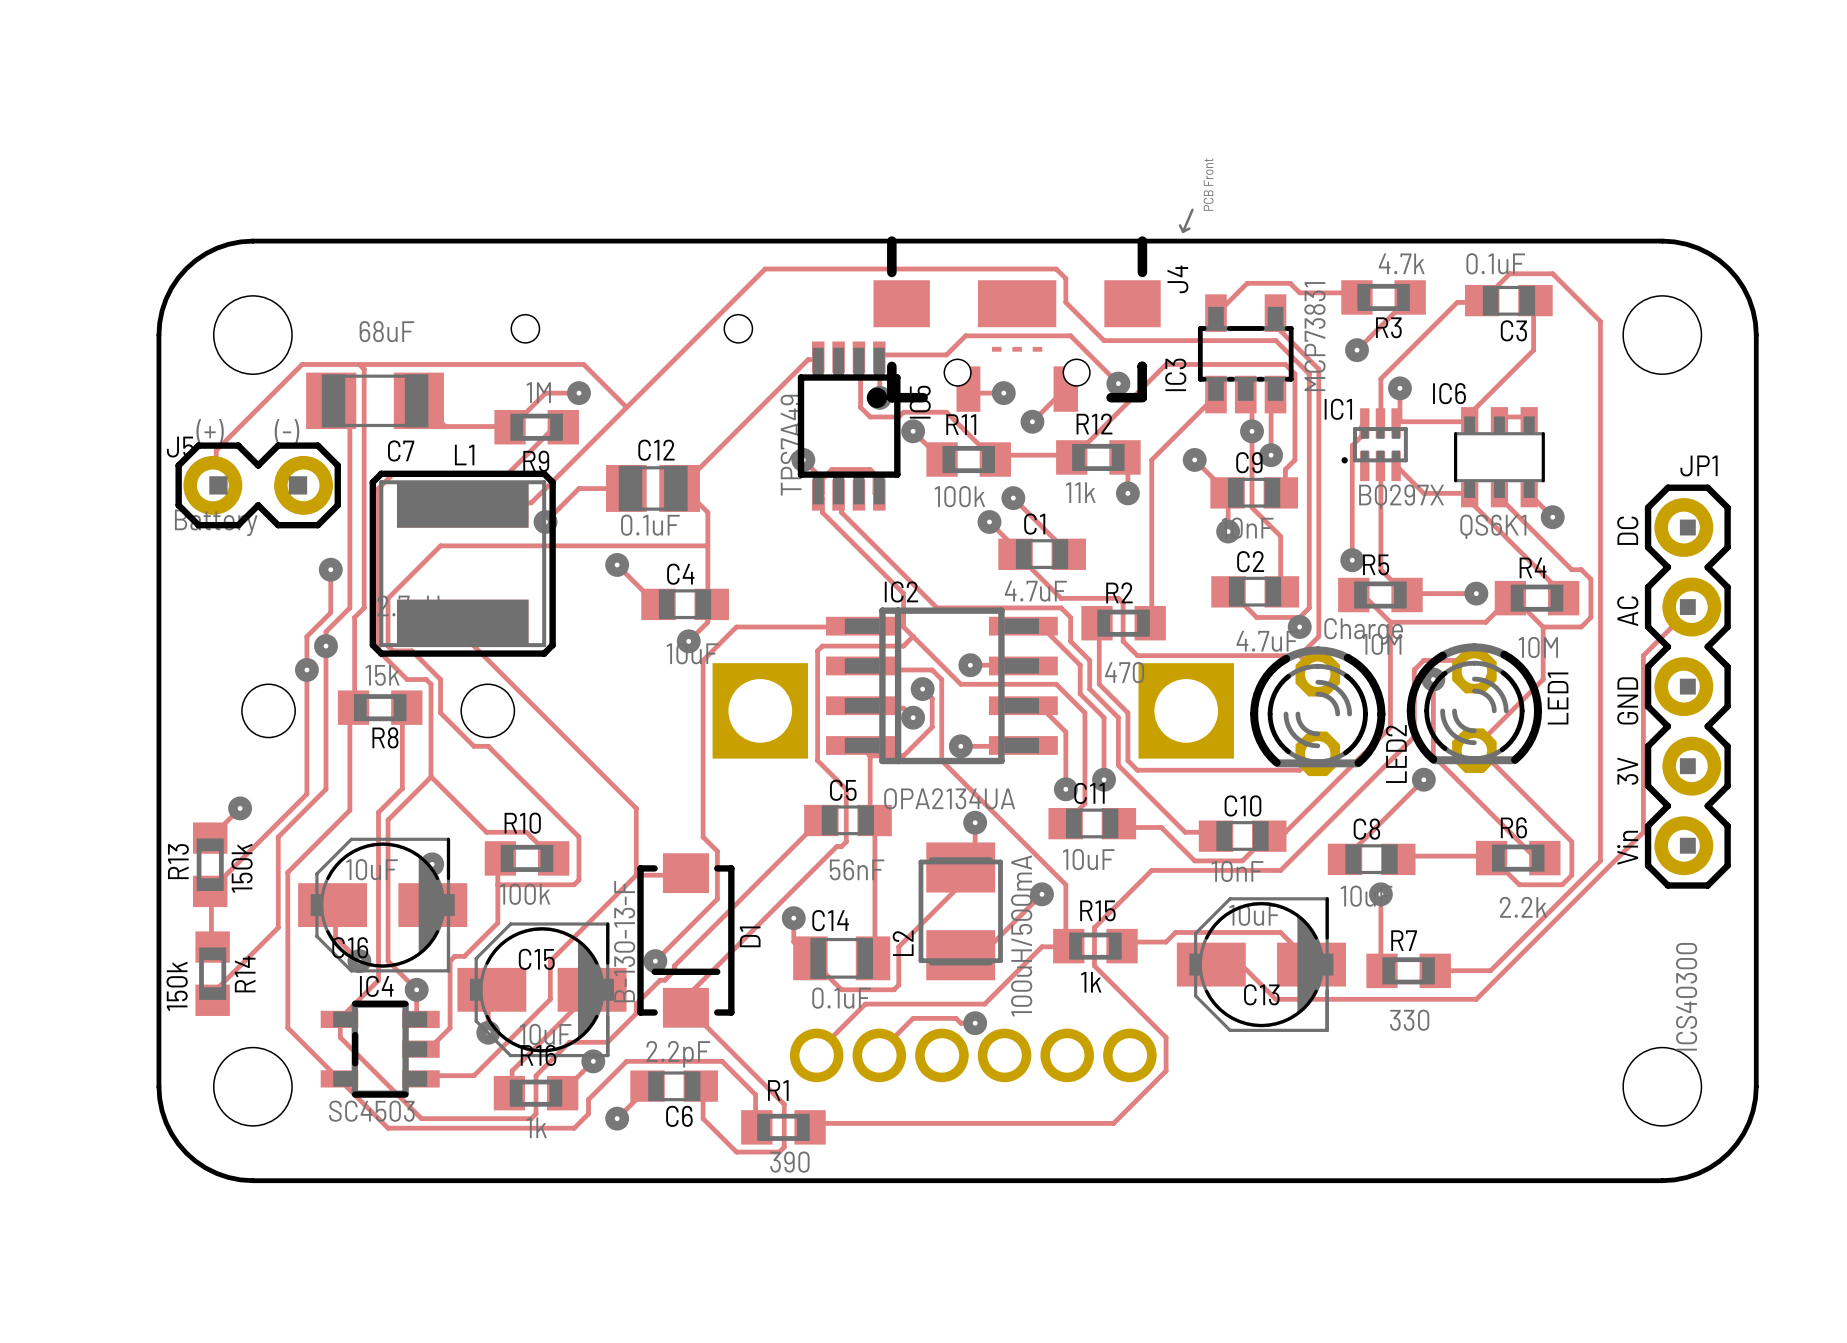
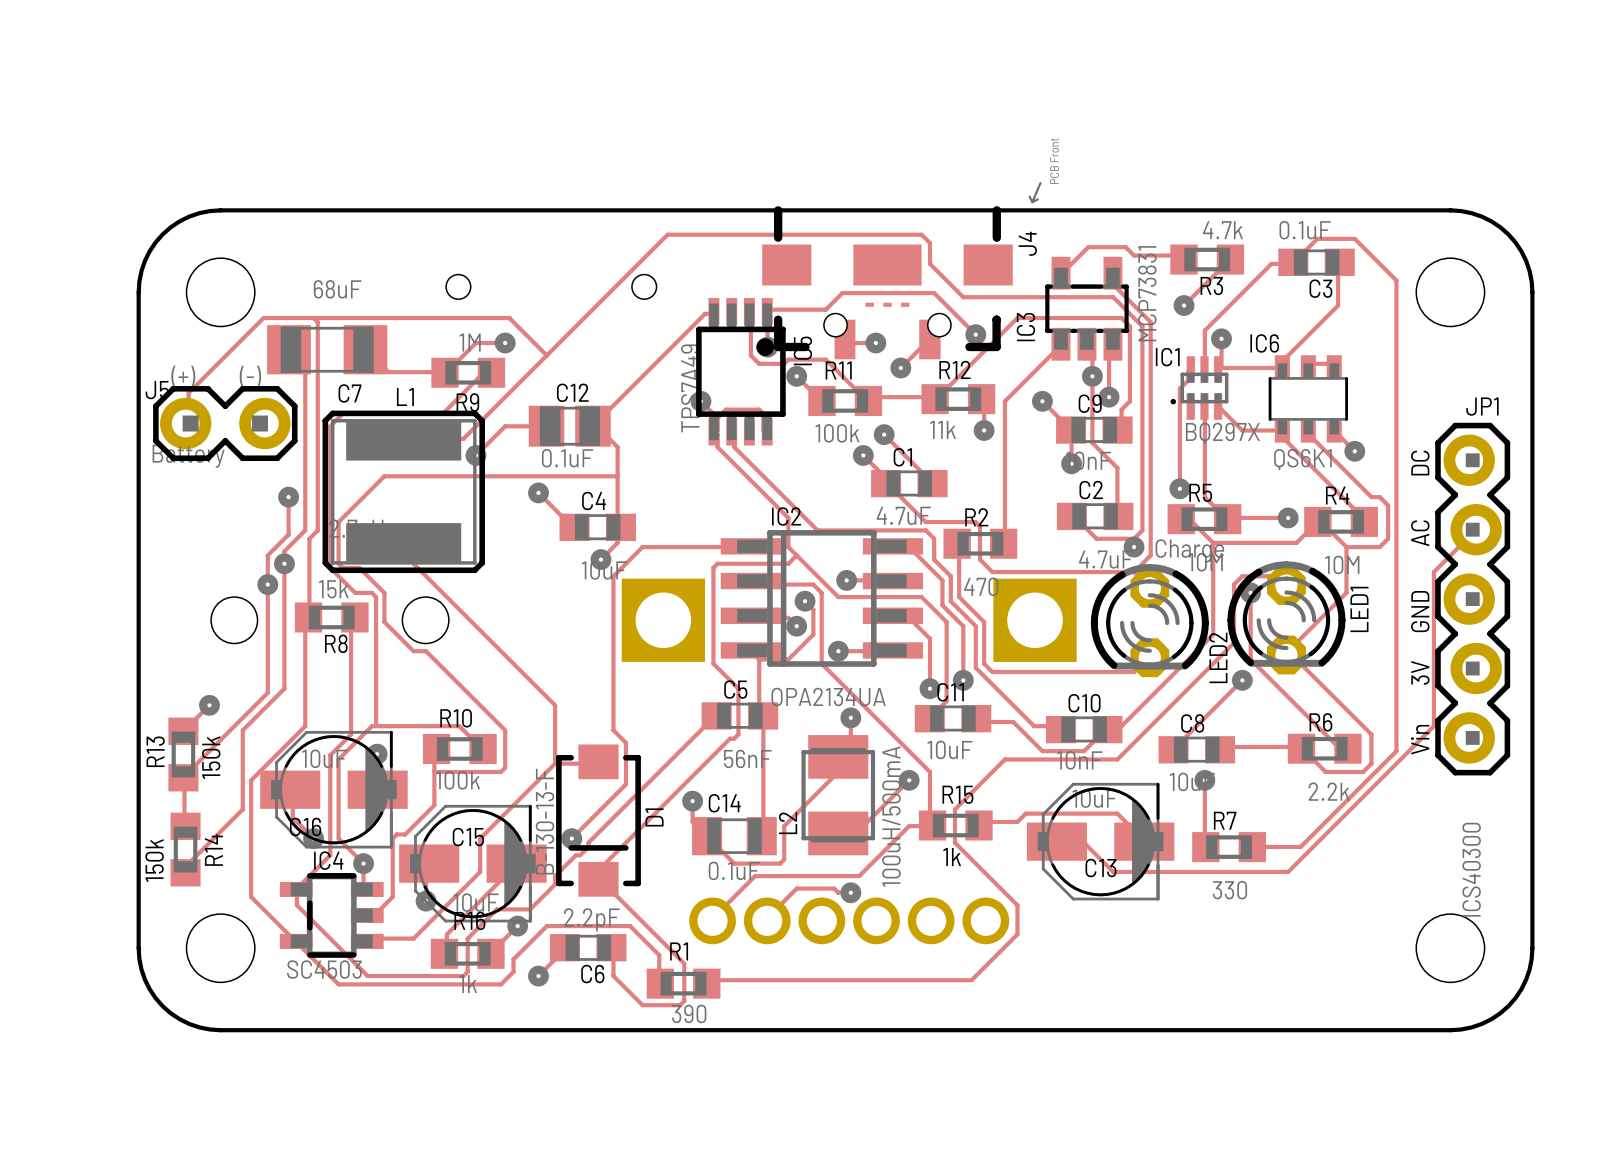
track: (431, 776) (486, 832) -> (376, 678) (376, 726)
track: (431, 777) (388, 820) (388, 870) -> (424, 726) (371, 726) (338, 759)
track: (402, 788) (378, 812) (378, 865) -> (351, 688) (351, 734) (330, 755)
track: (349, 810) (287, 872) (287, 894) -> (305, 707) (305, 726) (251, 780)

